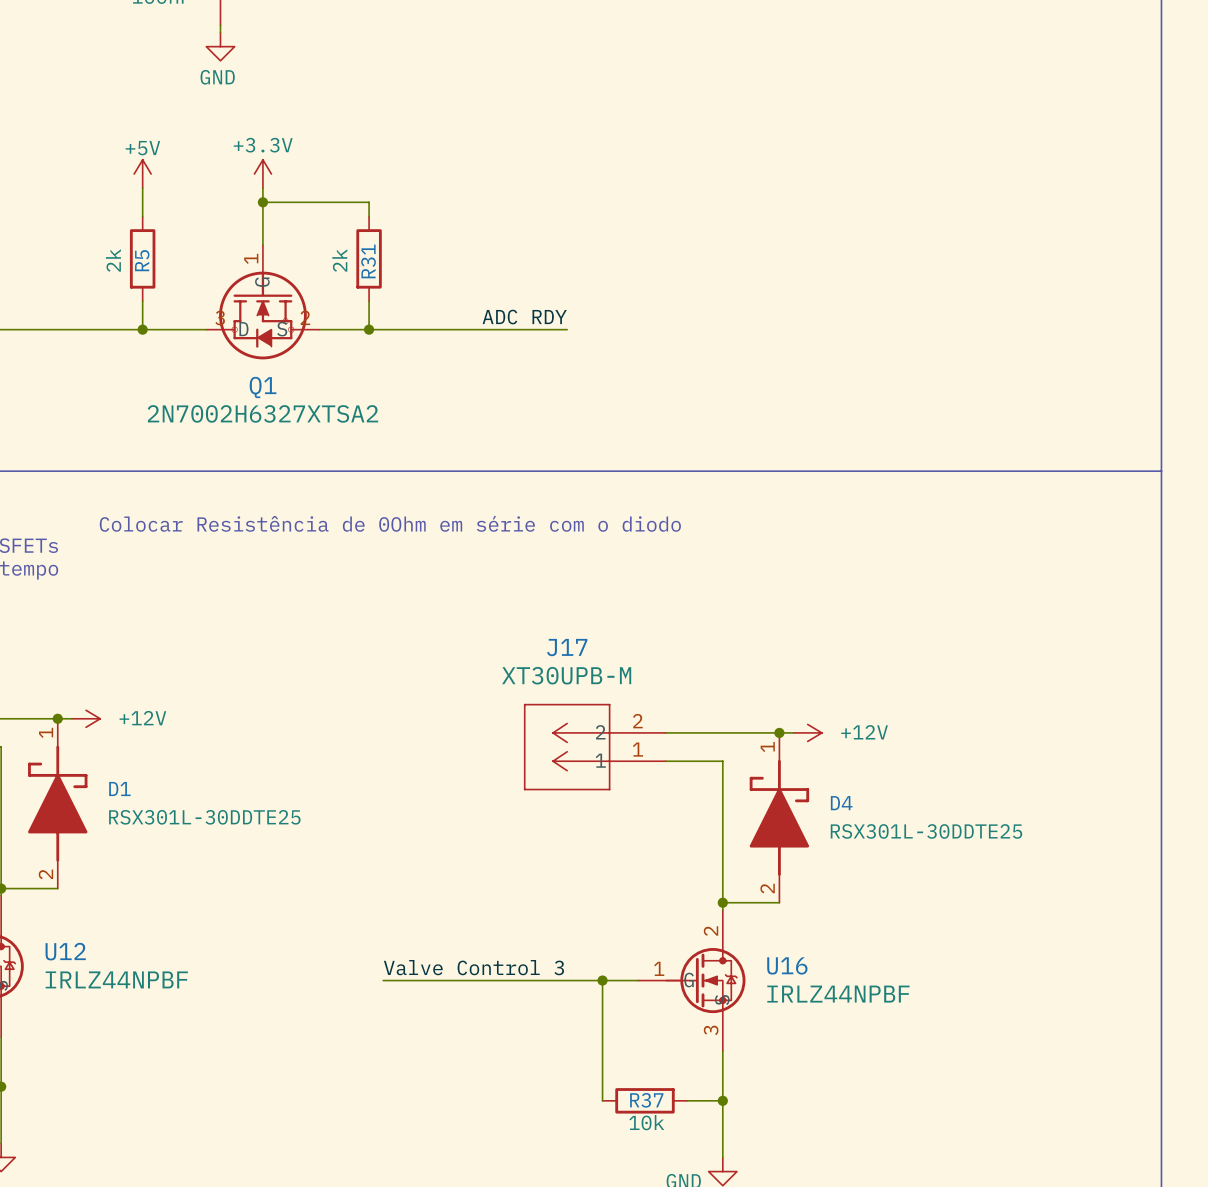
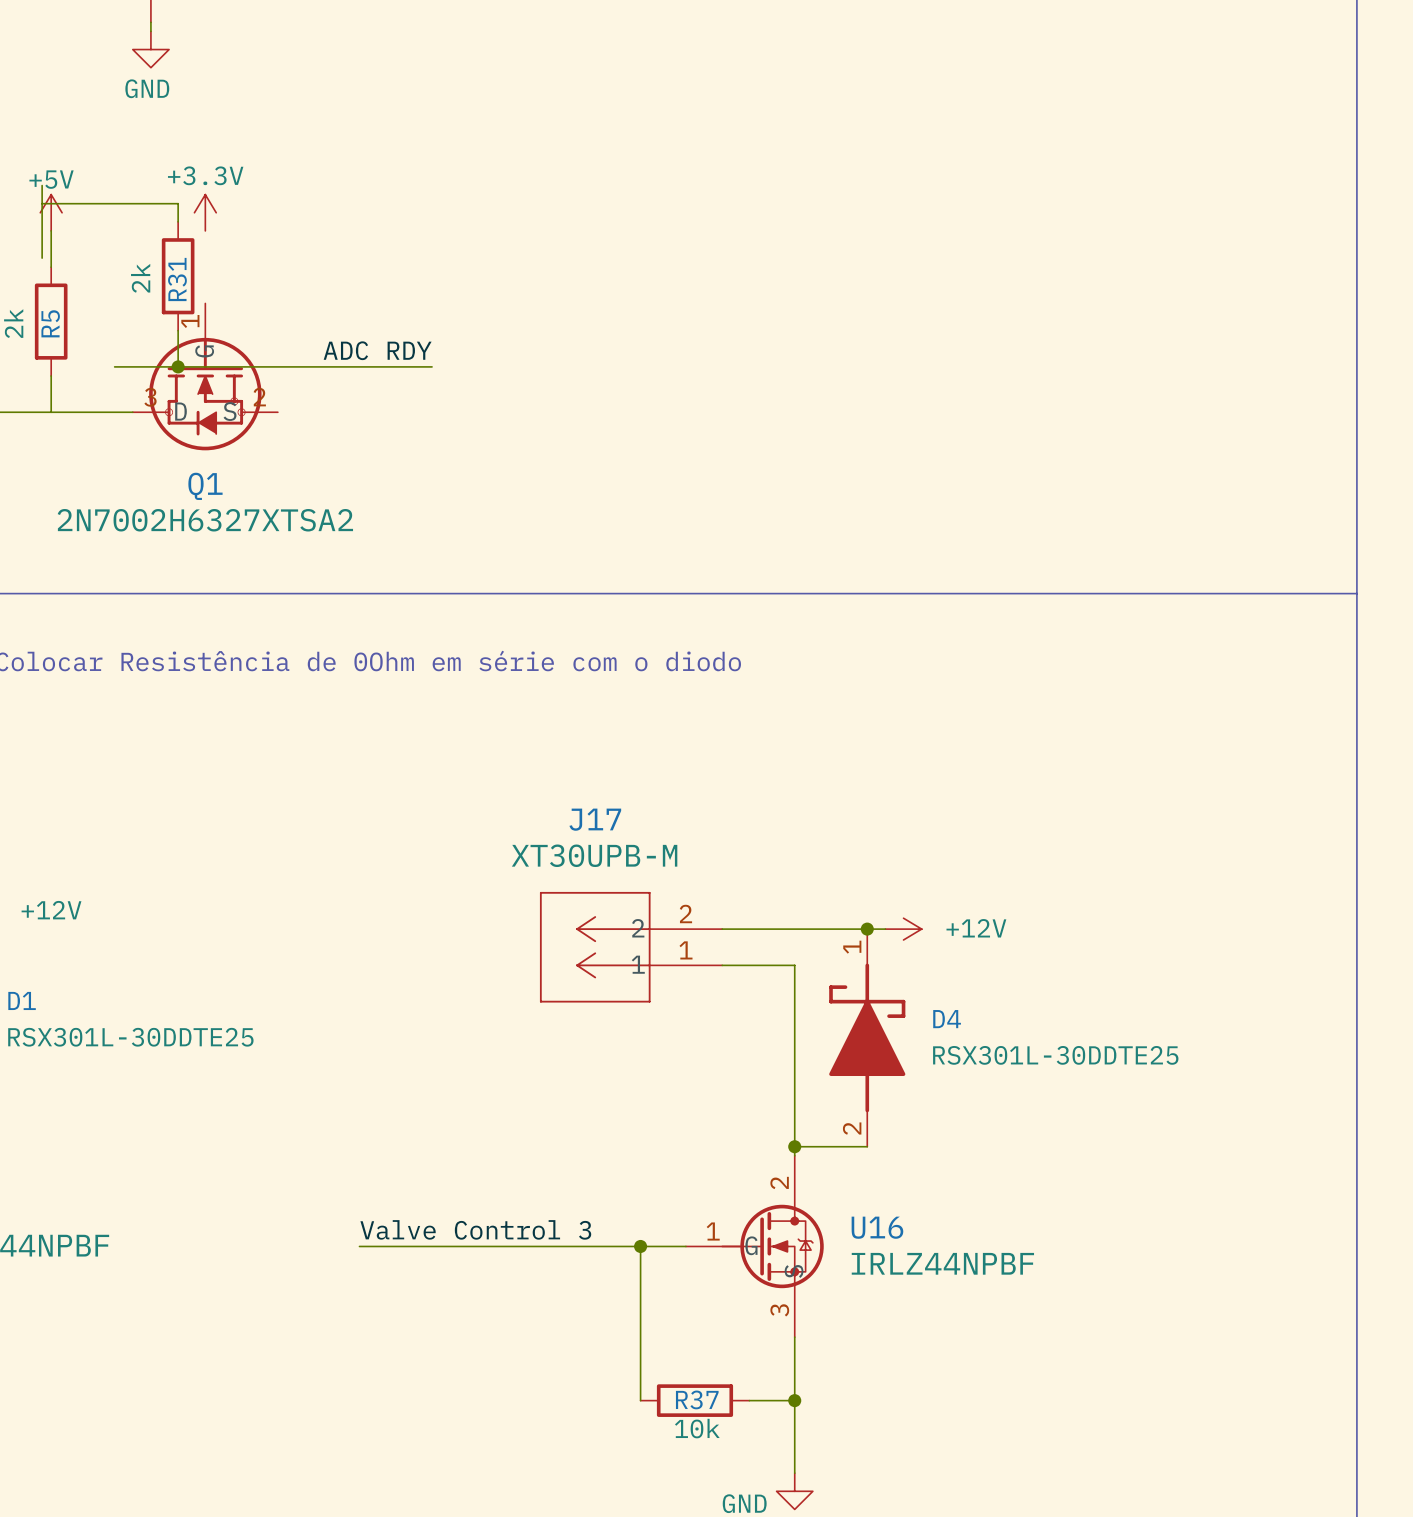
wire: (262, 188) (262, 244) -> (42, 185) (42, 258)
wire: (262, 202) (369, 202) (369, 216) -> (42, 203) (178, 203) (178, 221)
junction: (262, 202) -> none
R31 position: (369, 258) -> (178, 276)
junction: none -> (178, 366)
wire: (369, 301) (369, 329) -> (178, 330) (178, 366)
label position: ADC RDY (524, 317) -> ADC RDY (377, 350)
junction: (142, 329) -> none
wire: (319, 329) (567, 329) -> (114, 366) (432, 366)
junction: (369, 329) -> none

